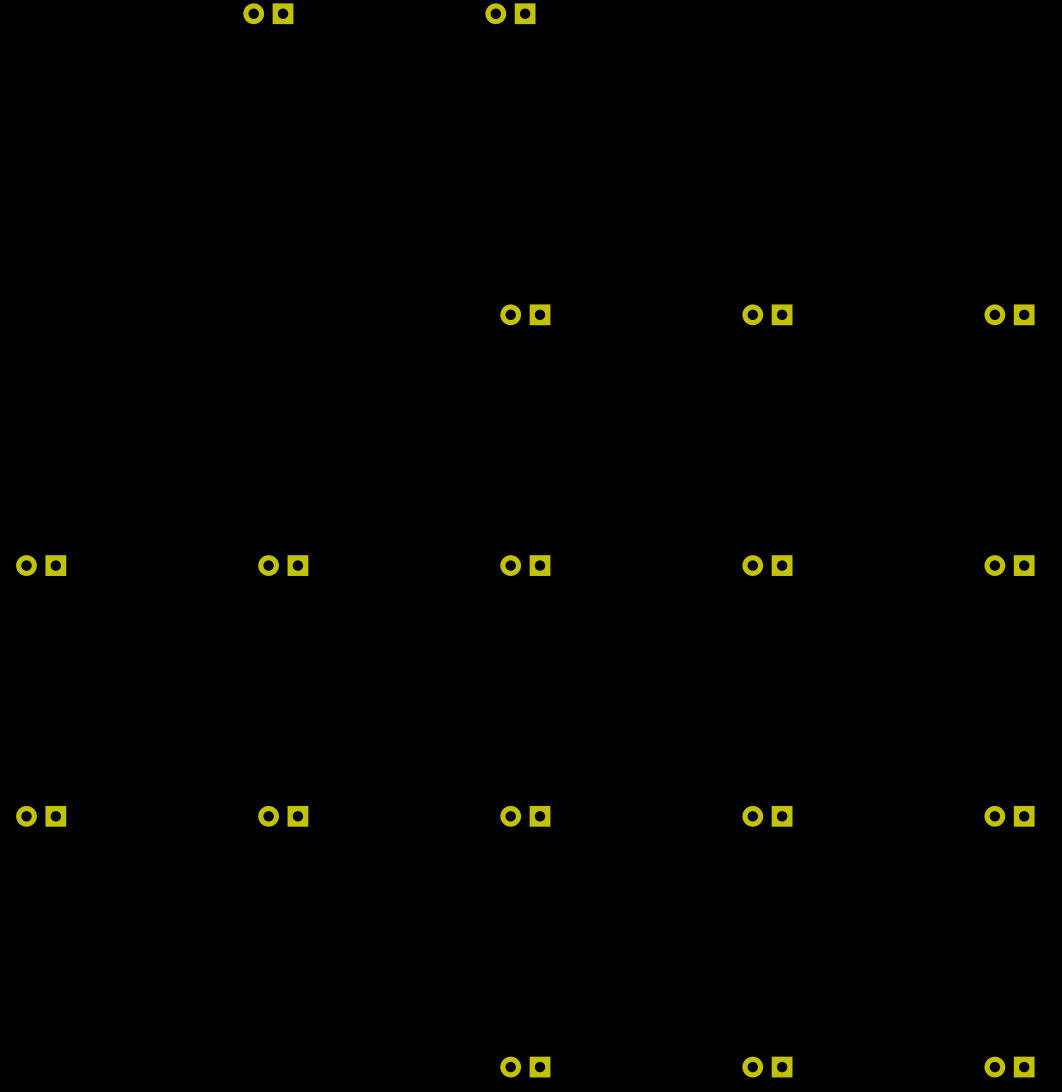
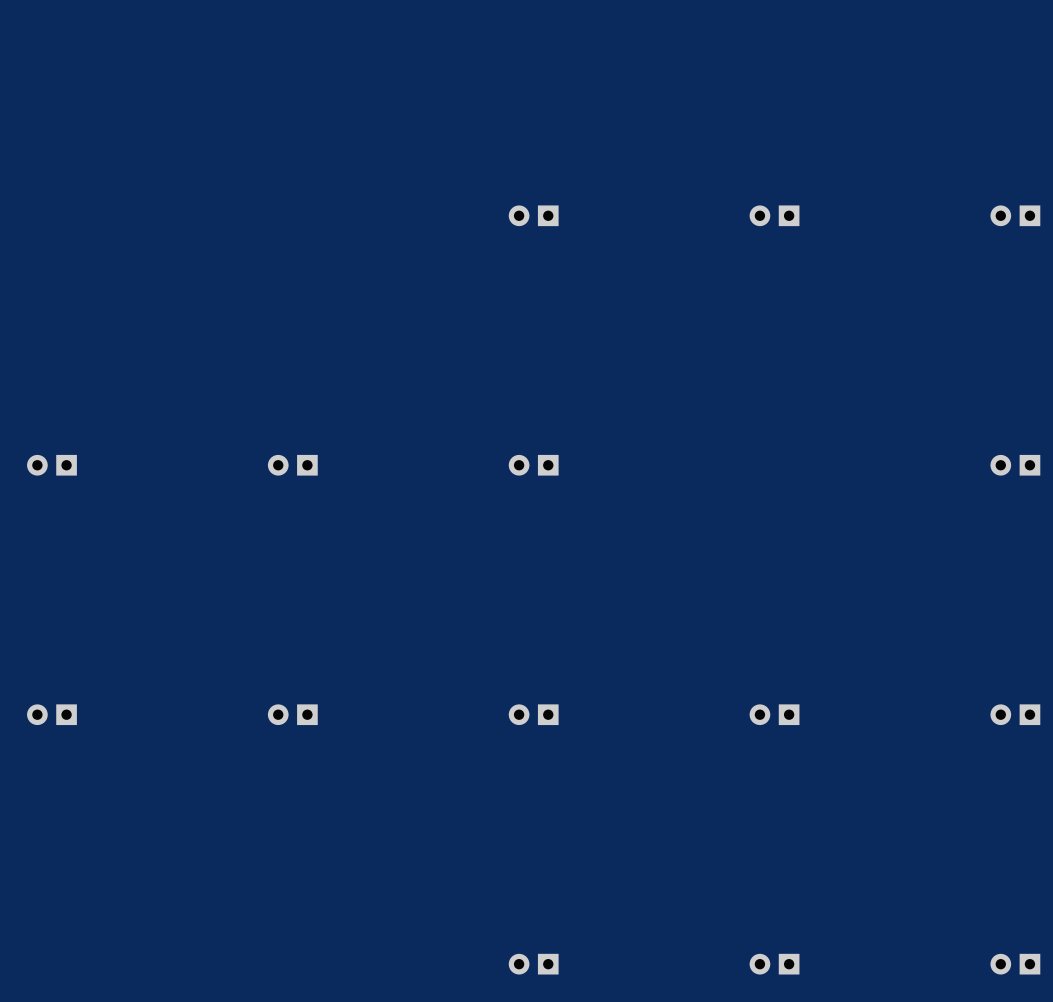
part: (767, 565) -> none

